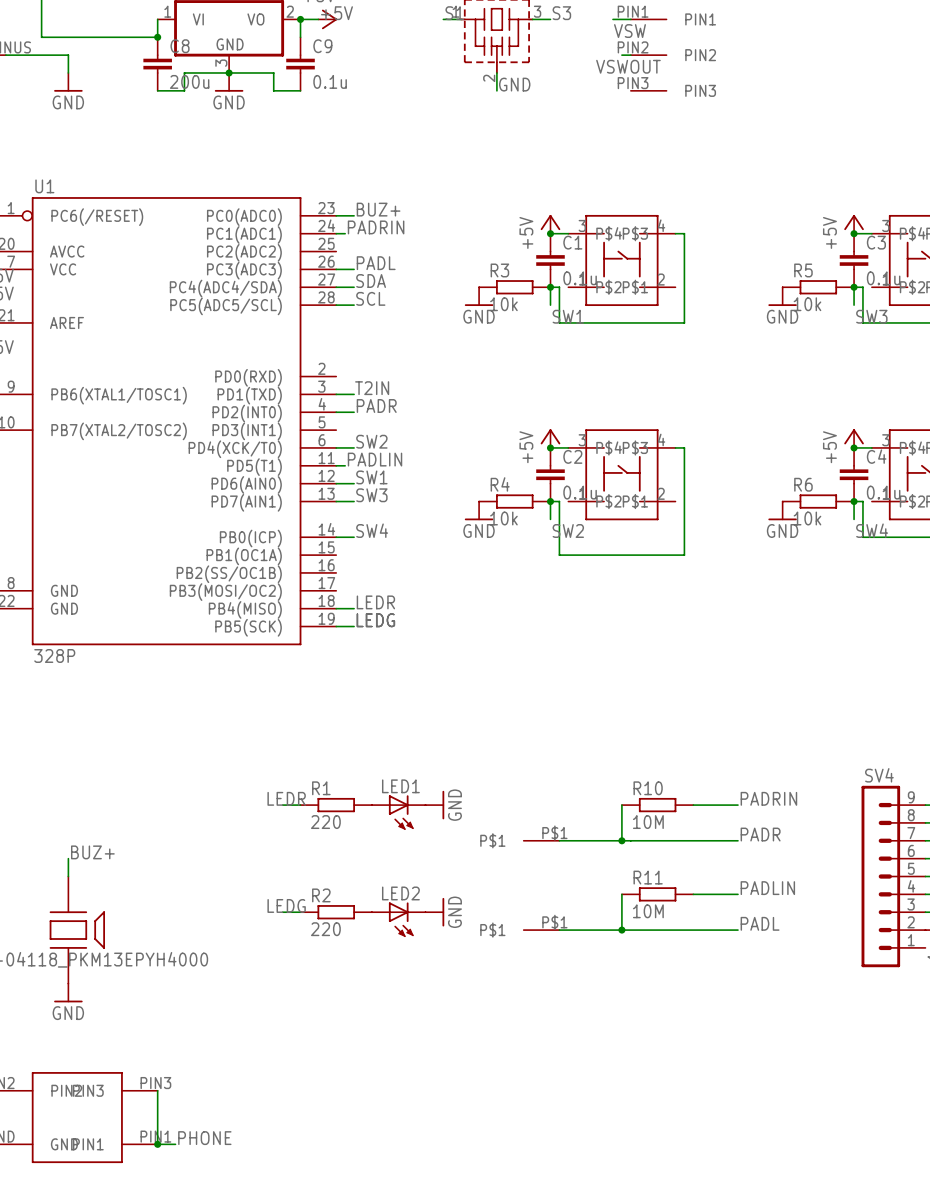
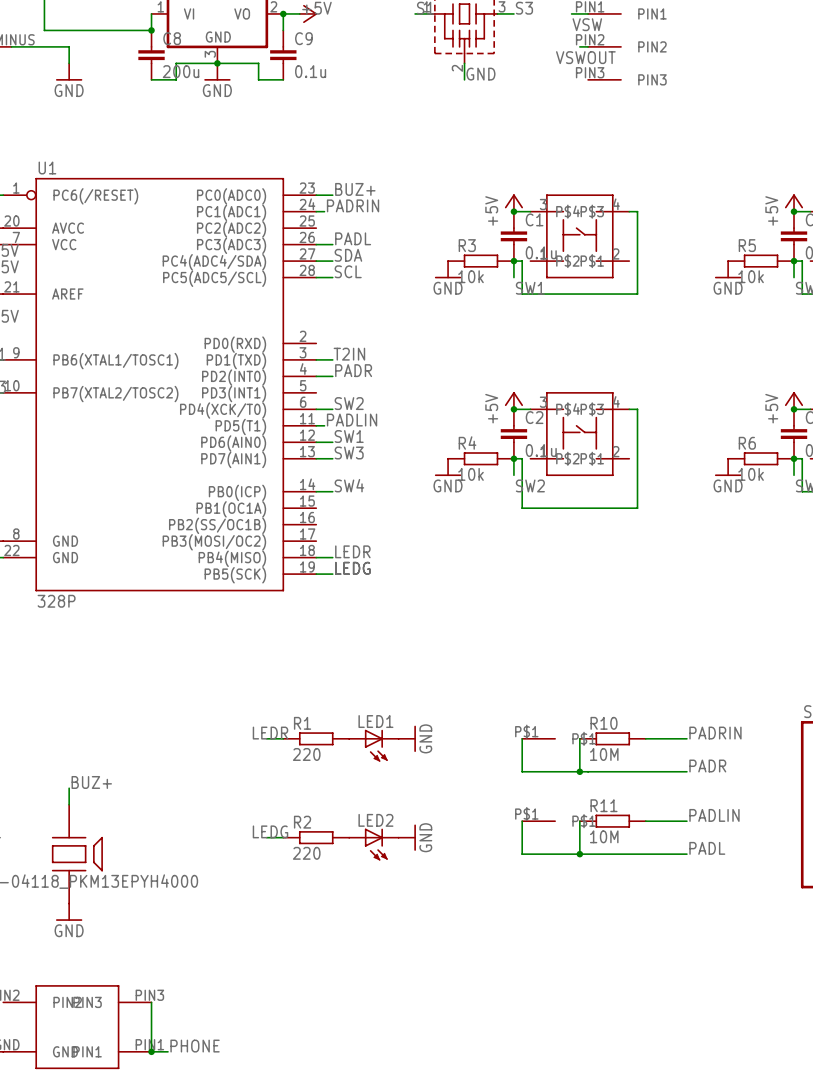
wire: none -> (522, 738) (522, 771)
part: none -> (538, 738)
part: (541, 840) -> none
wire: none -> (522, 821) (522, 854)
part: none -> (538, 821)
part: (541, 930) -> none

